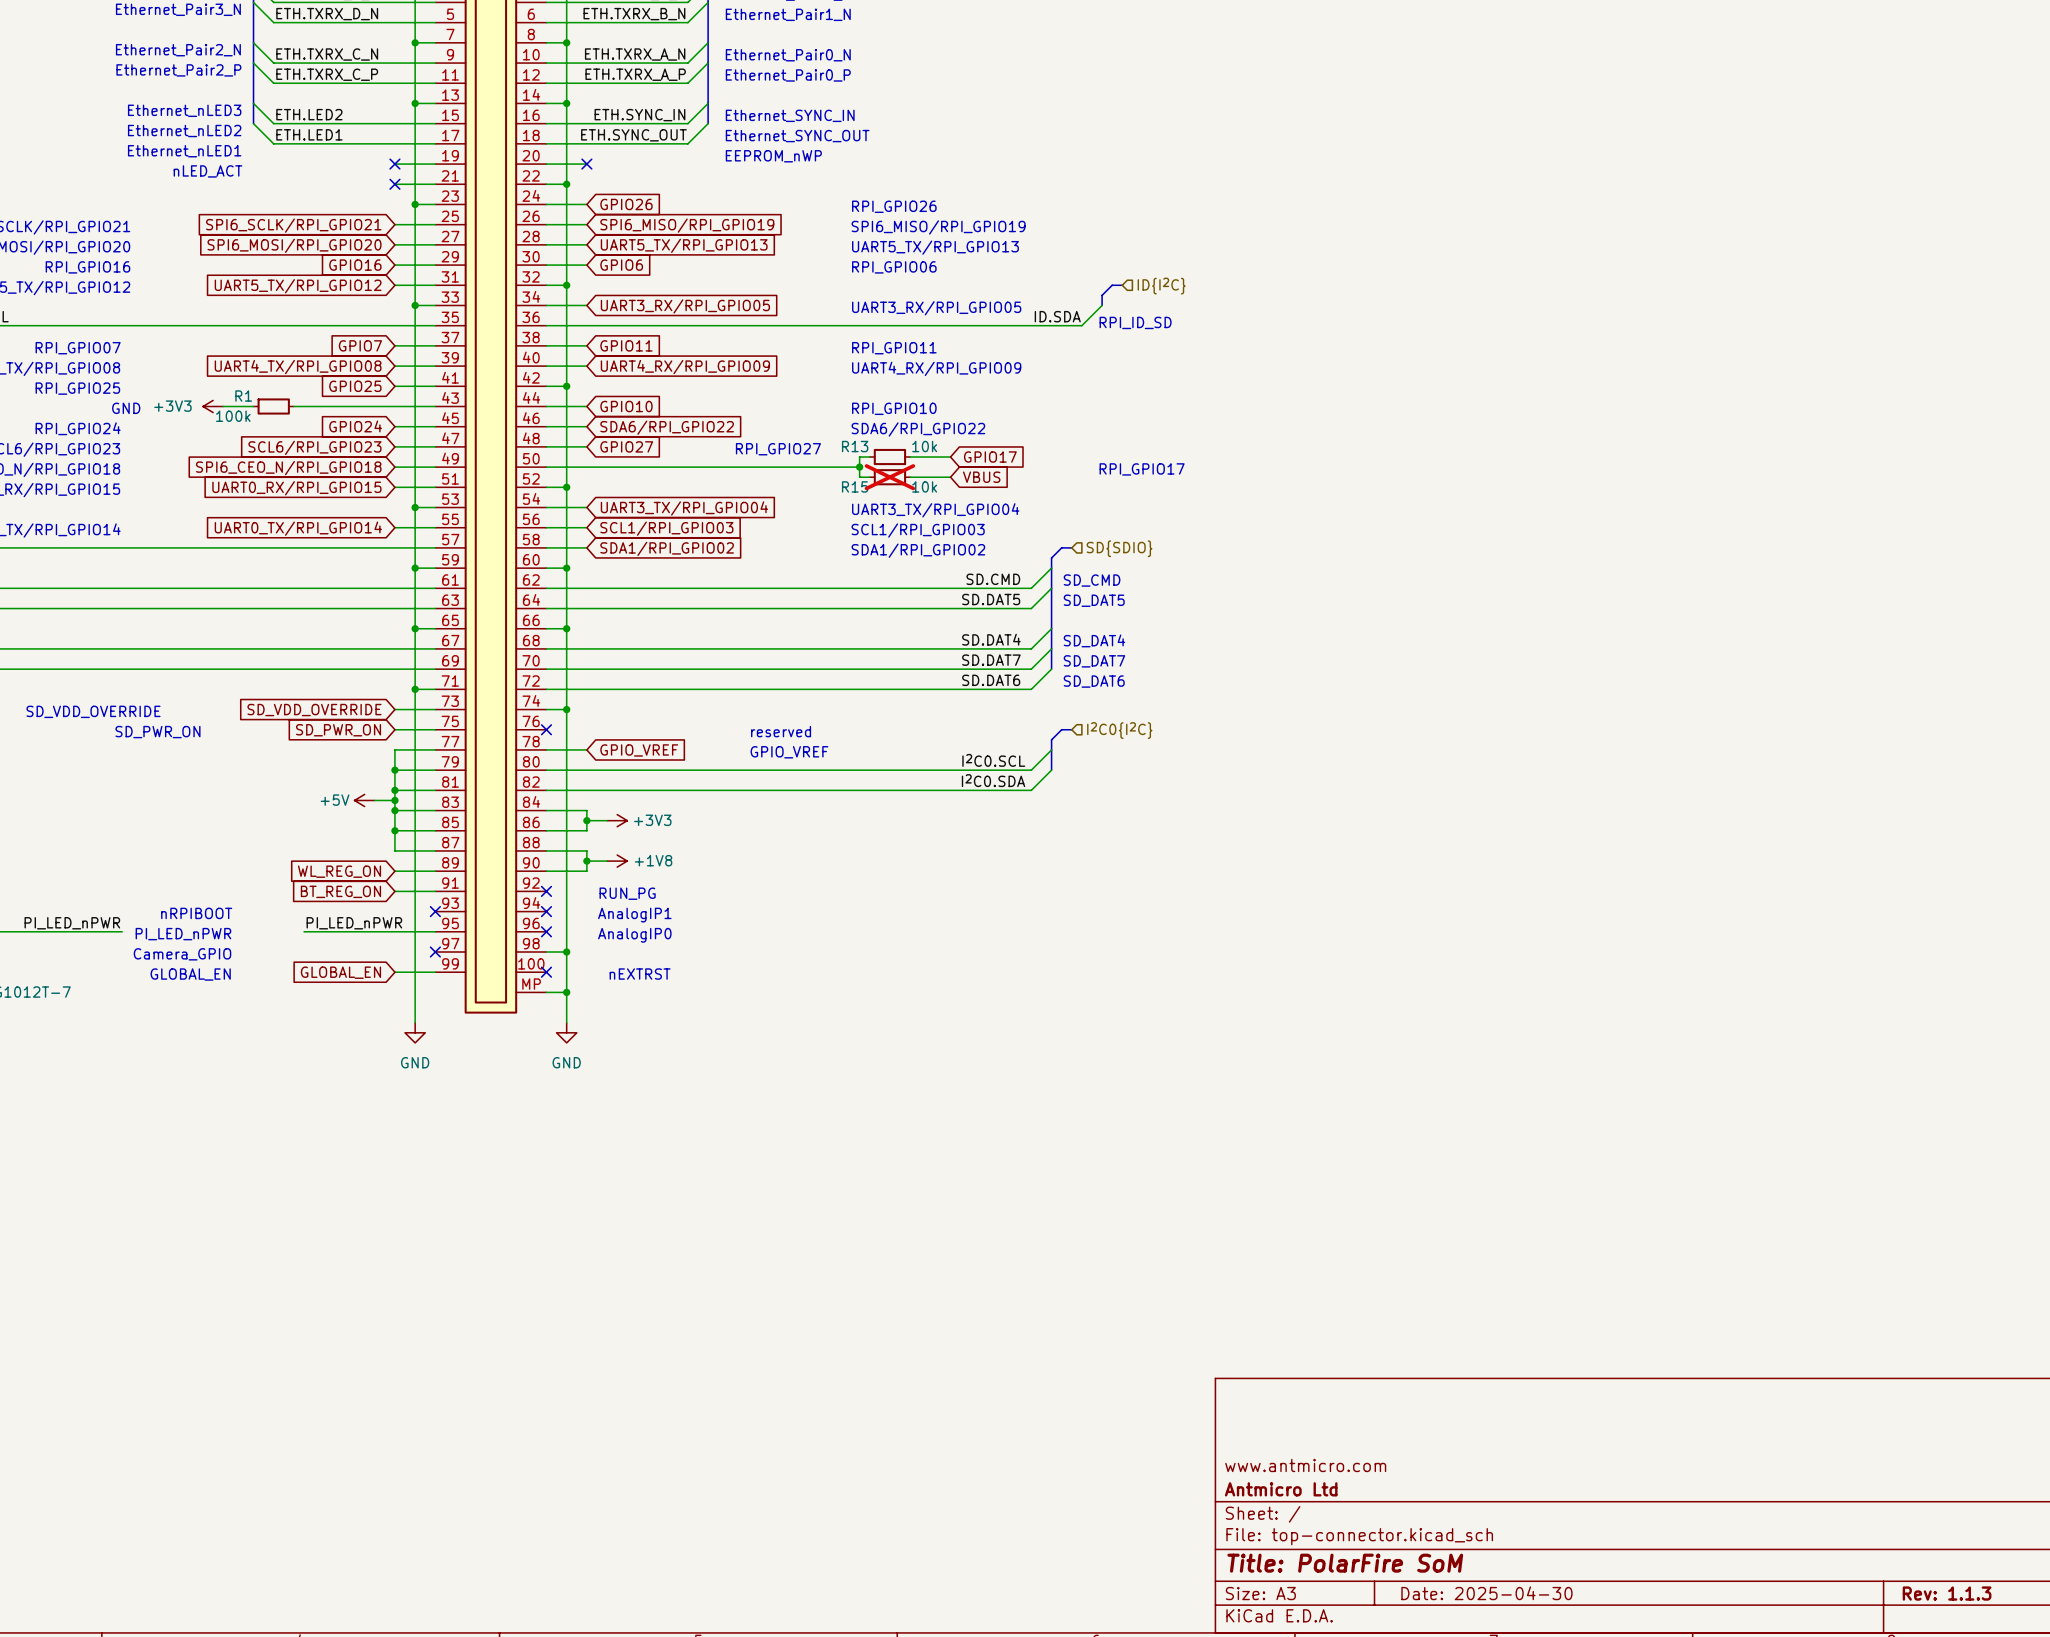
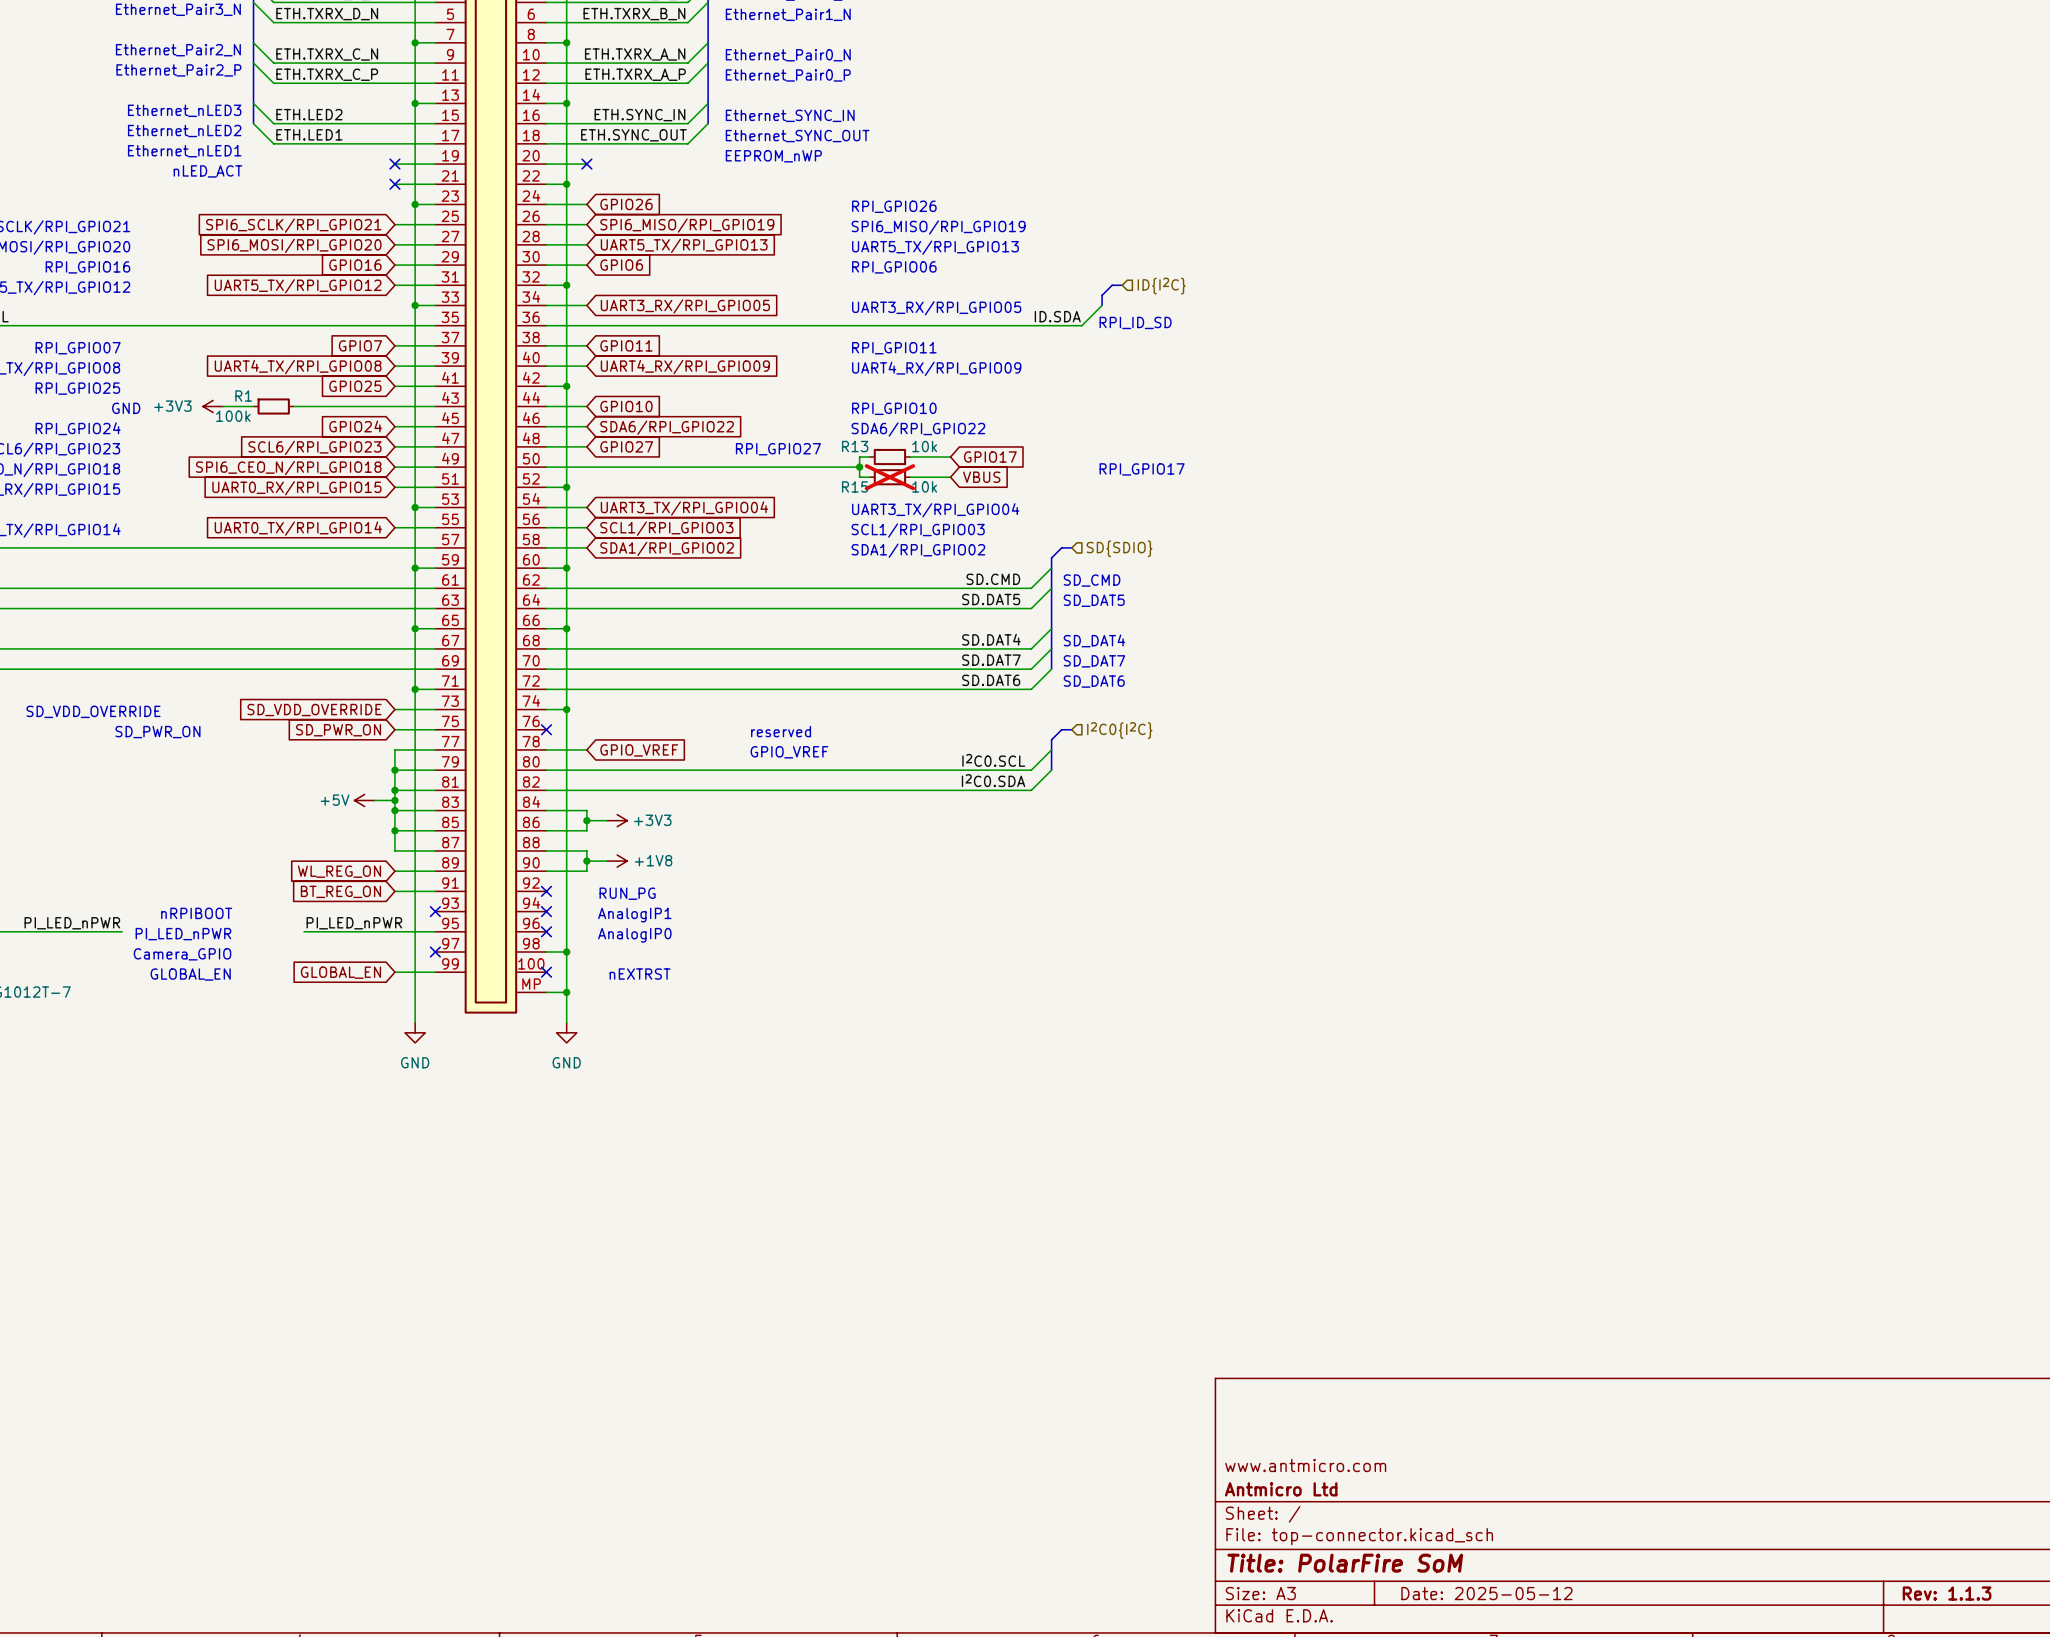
title block: Date: 2025-04-30 (1486, 1593) -> Date: 2025-05-12 (1486, 1593)

